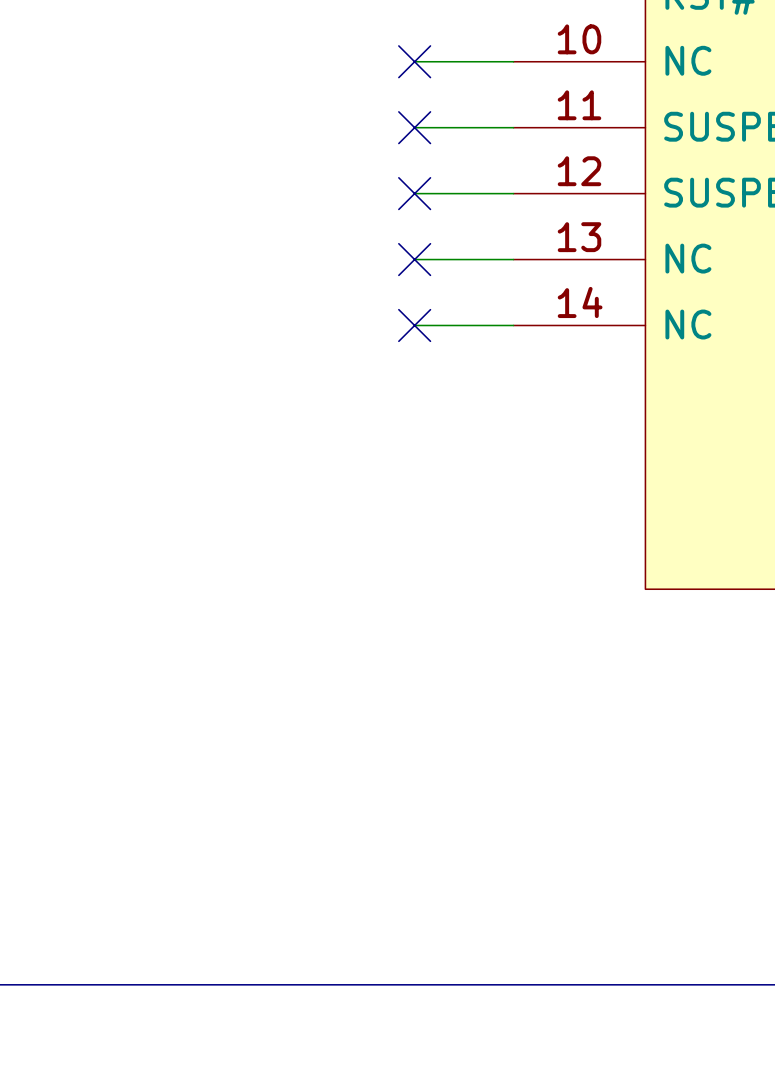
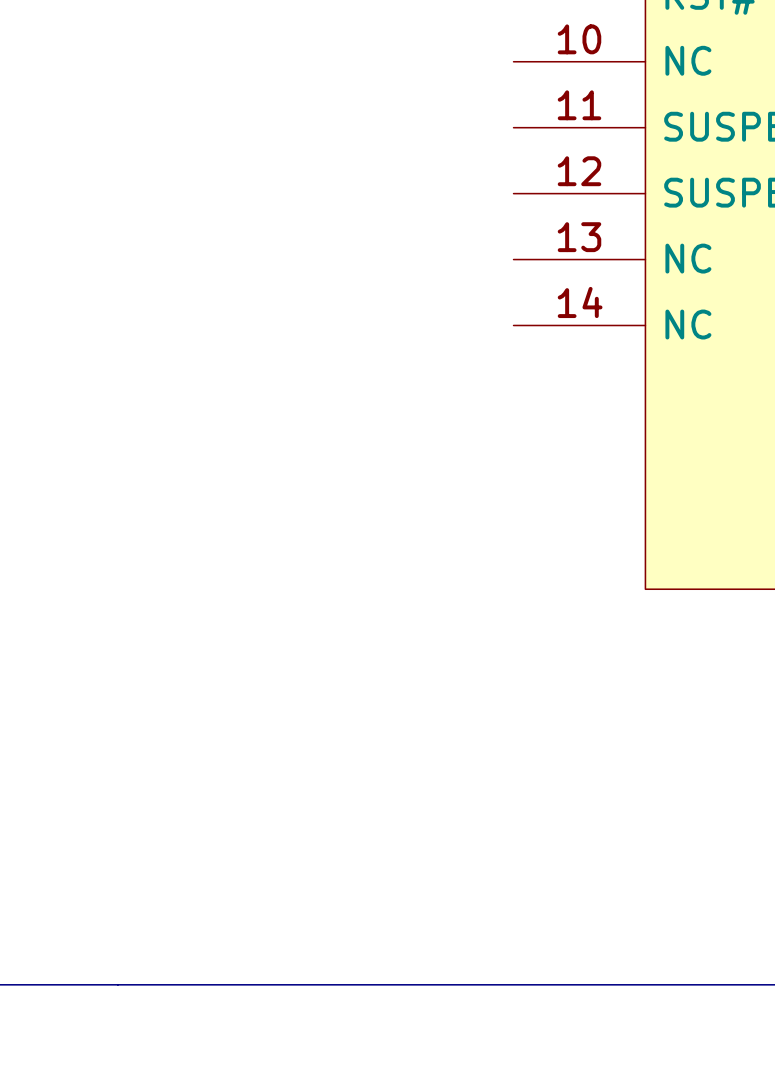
wire: (414, 61) (513, 61) -> none
no-connect mark: (414, 61) -> none
wire: (414, 127) (513, 127) -> none
no-connect mark: (414, 127) -> none
wire: (414, 193) (513, 193) -> none
no-connect mark: (414, 193) -> none
wire: (414, 259) (513, 259) -> none
no-connect mark: (414, 259) -> none
wire: (414, 325) (513, 325) -> none
no-connect mark: (414, 325) -> none

